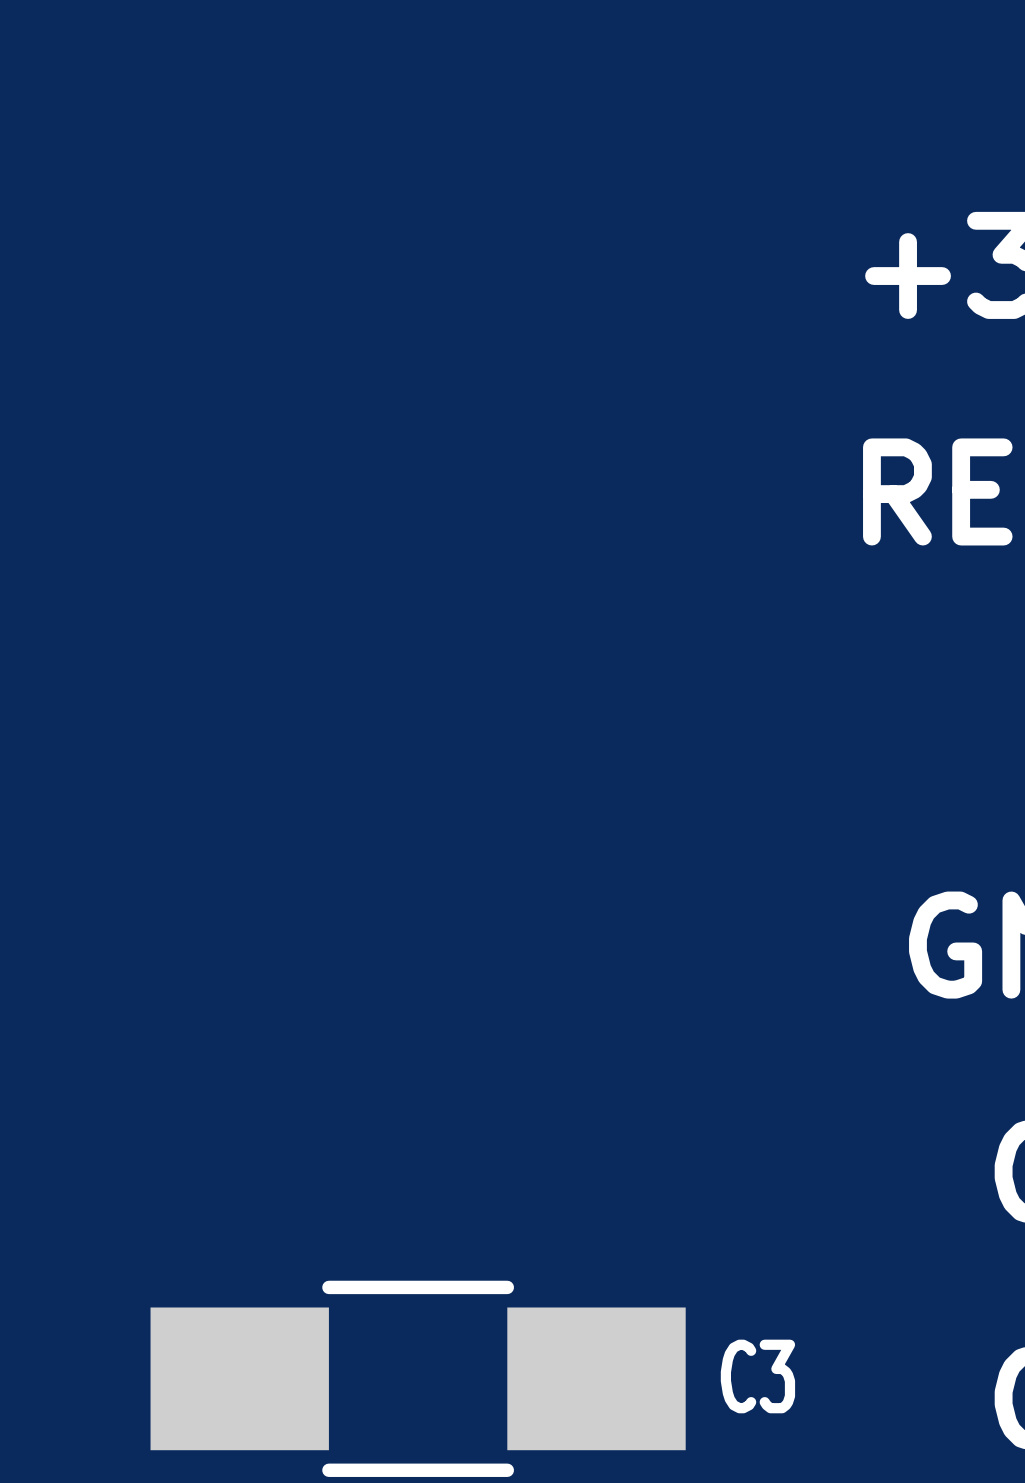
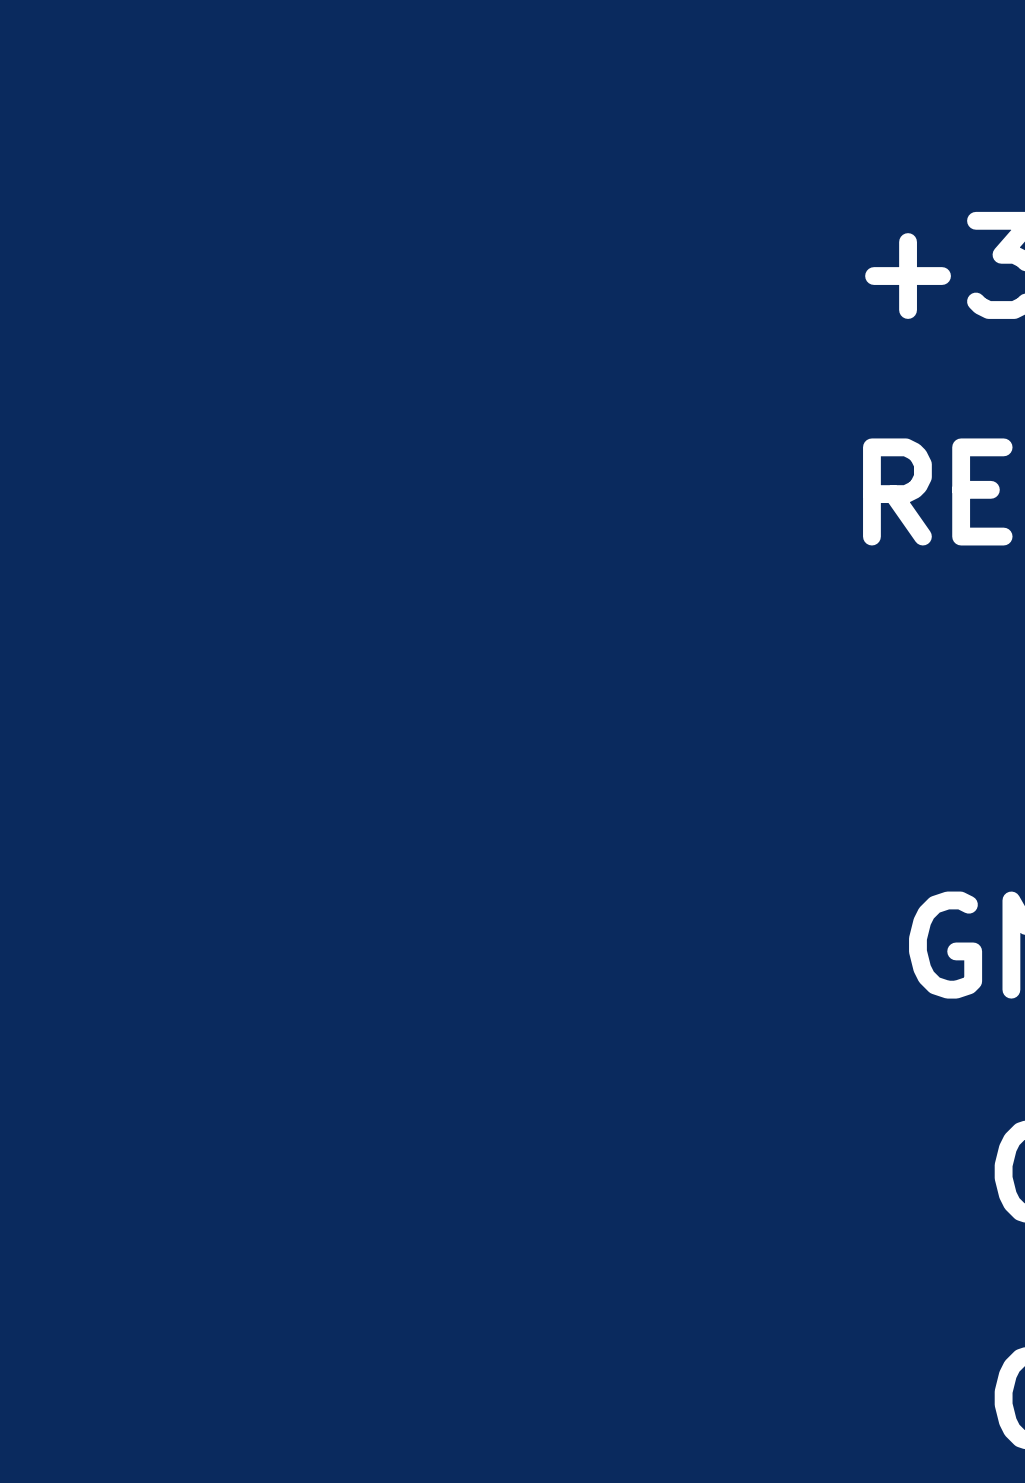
C3: (418, 1378) -> none

